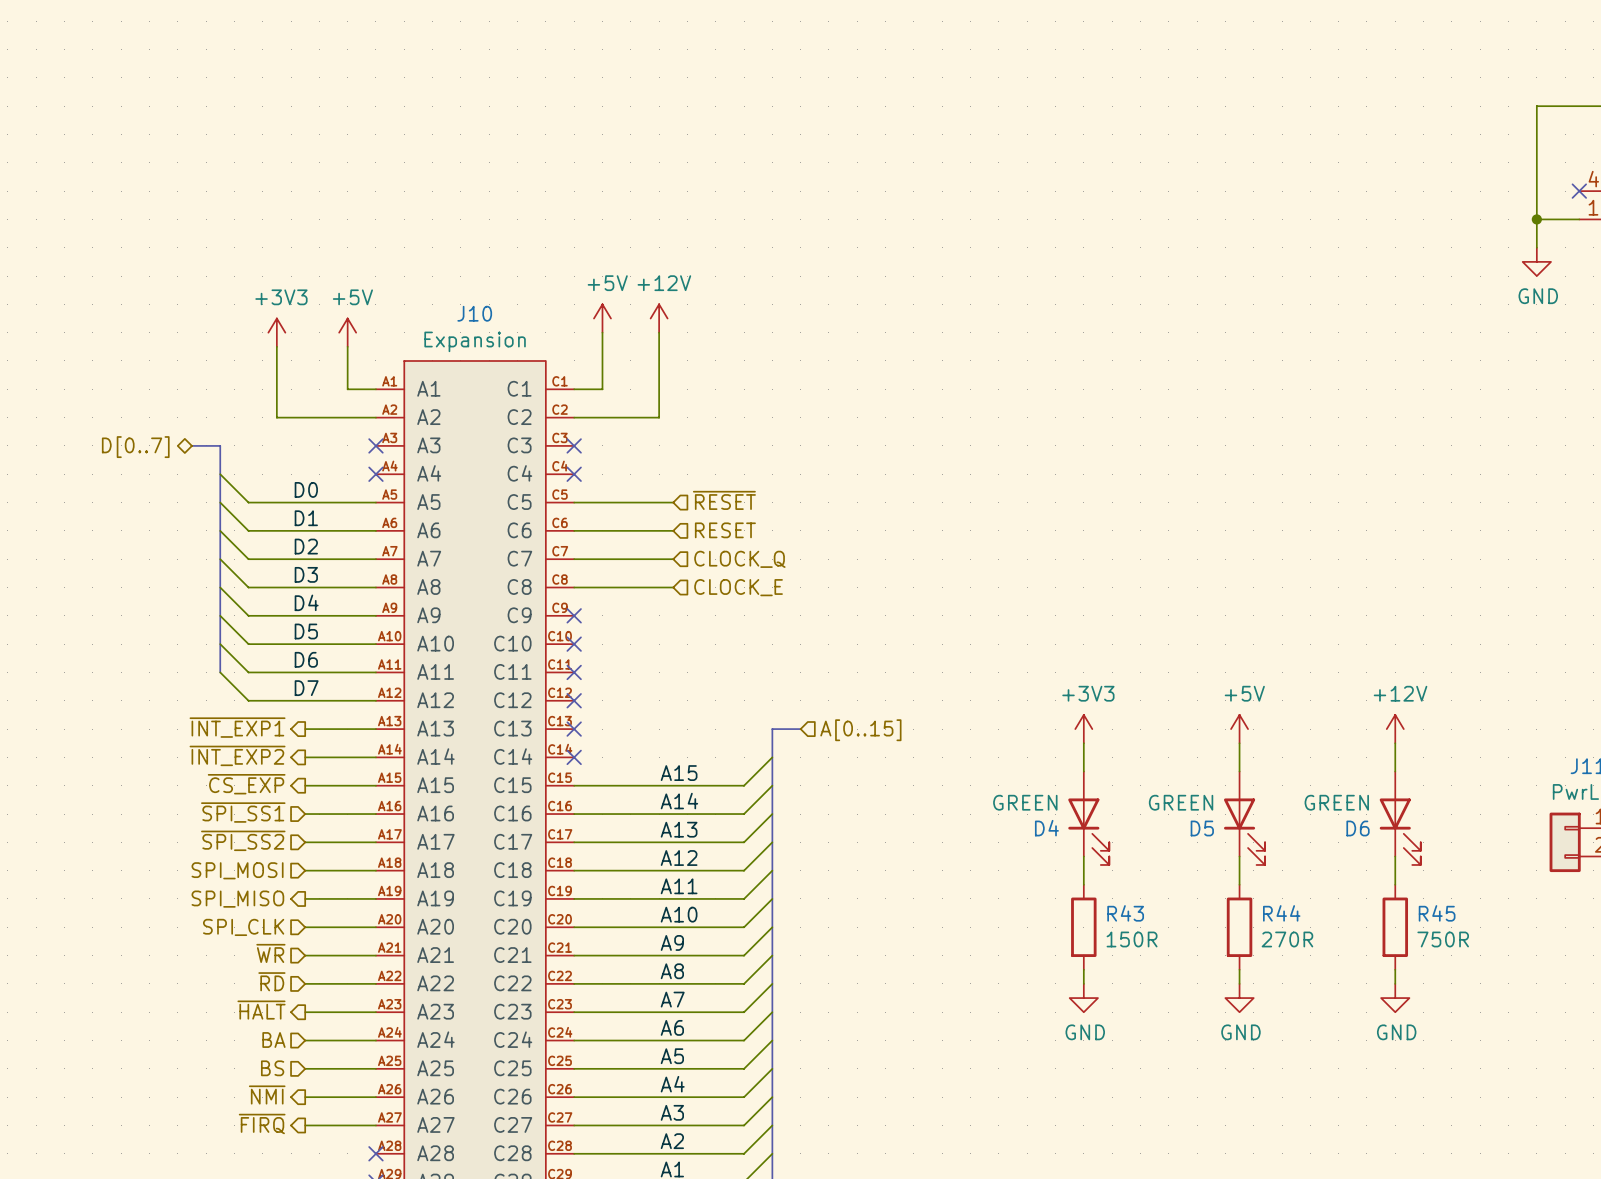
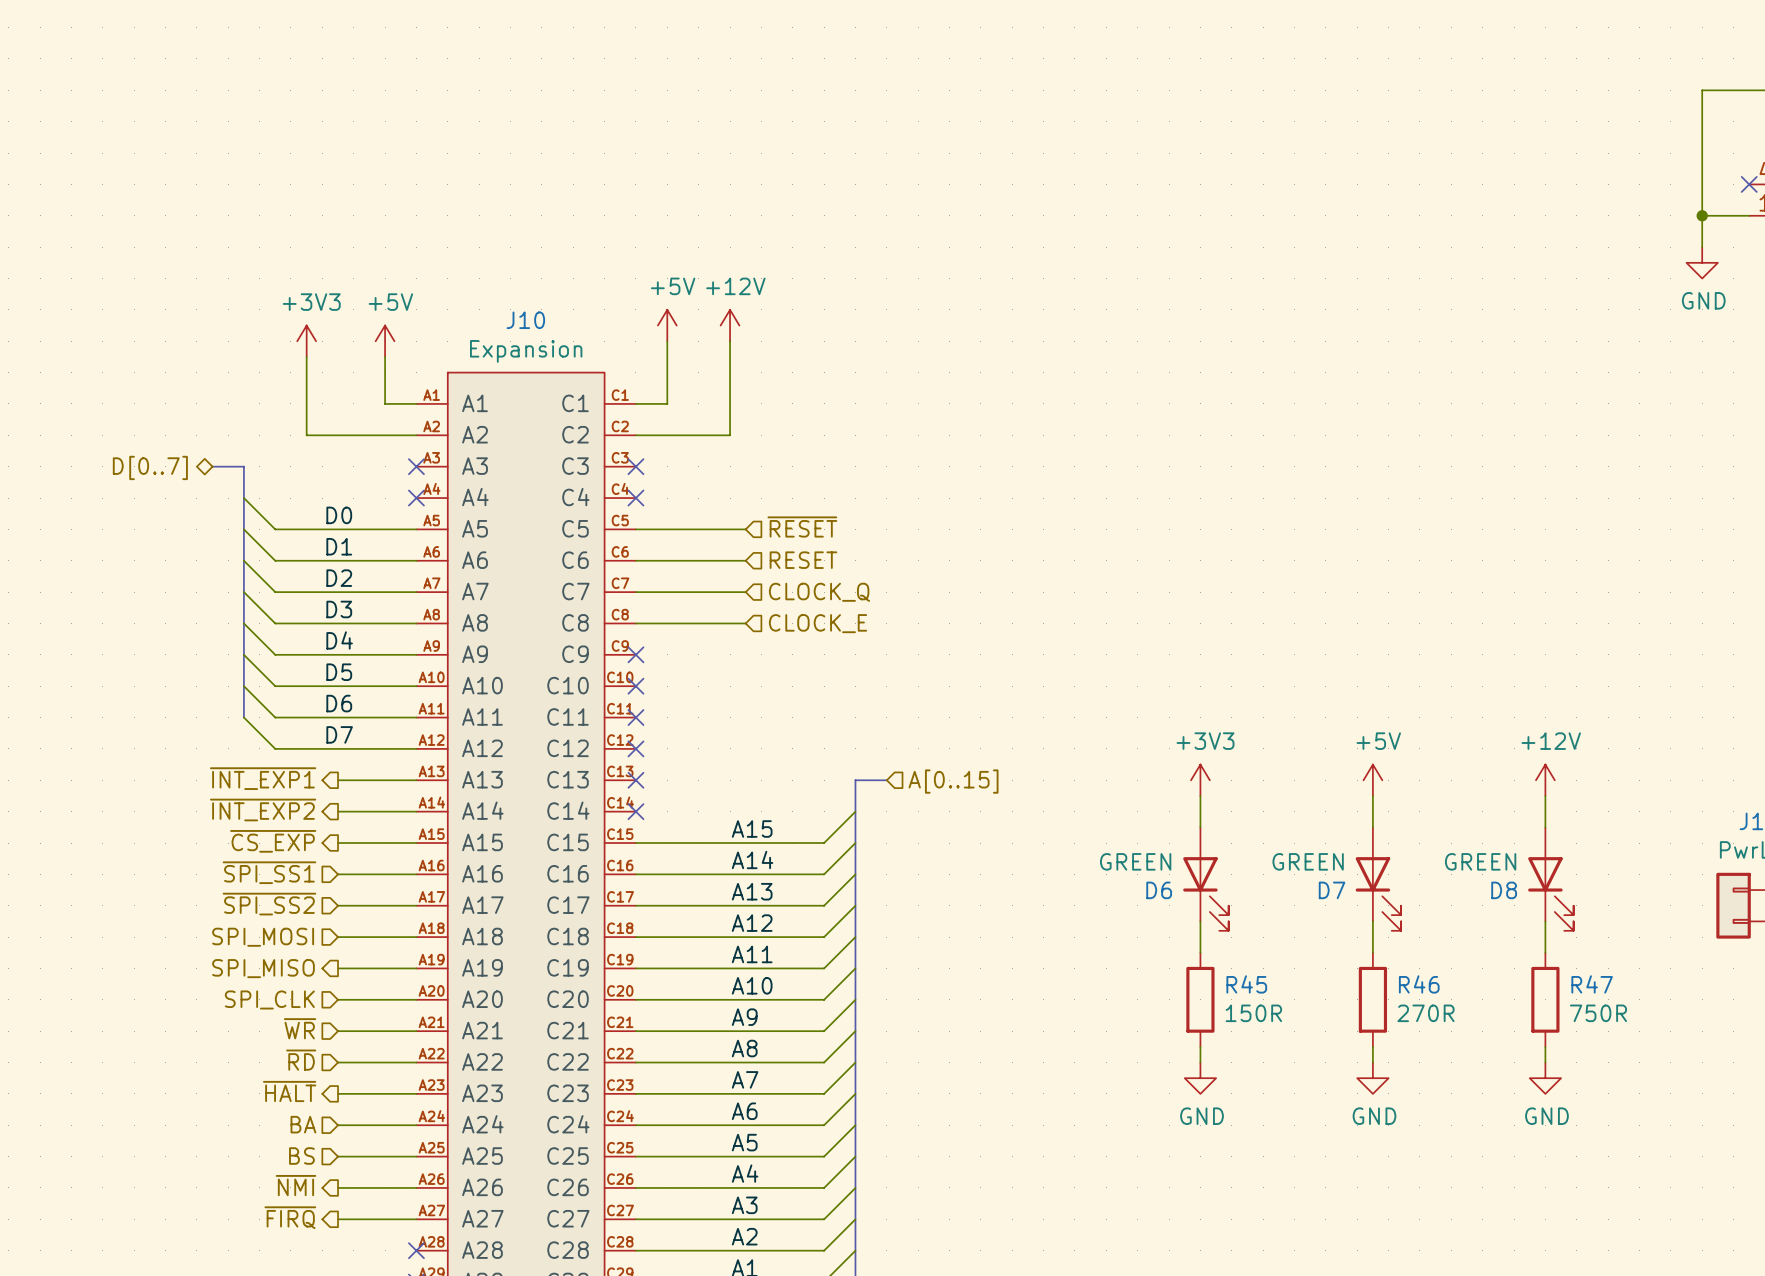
D4 name: D4 (1046, 828) -> D6 (1159, 890)
D5 name: D5 (1202, 828) -> D7 (1332, 890)
D6 name: D6 (1358, 828) -> D8 (1504, 890)
R43 name: R43 (1125, 913) -> R45 (1246, 984)
R44 name: R44 (1281, 913) -> R46 (1419, 984)
R45 name: R45 (1437, 913) -> R47 (1592, 984)

